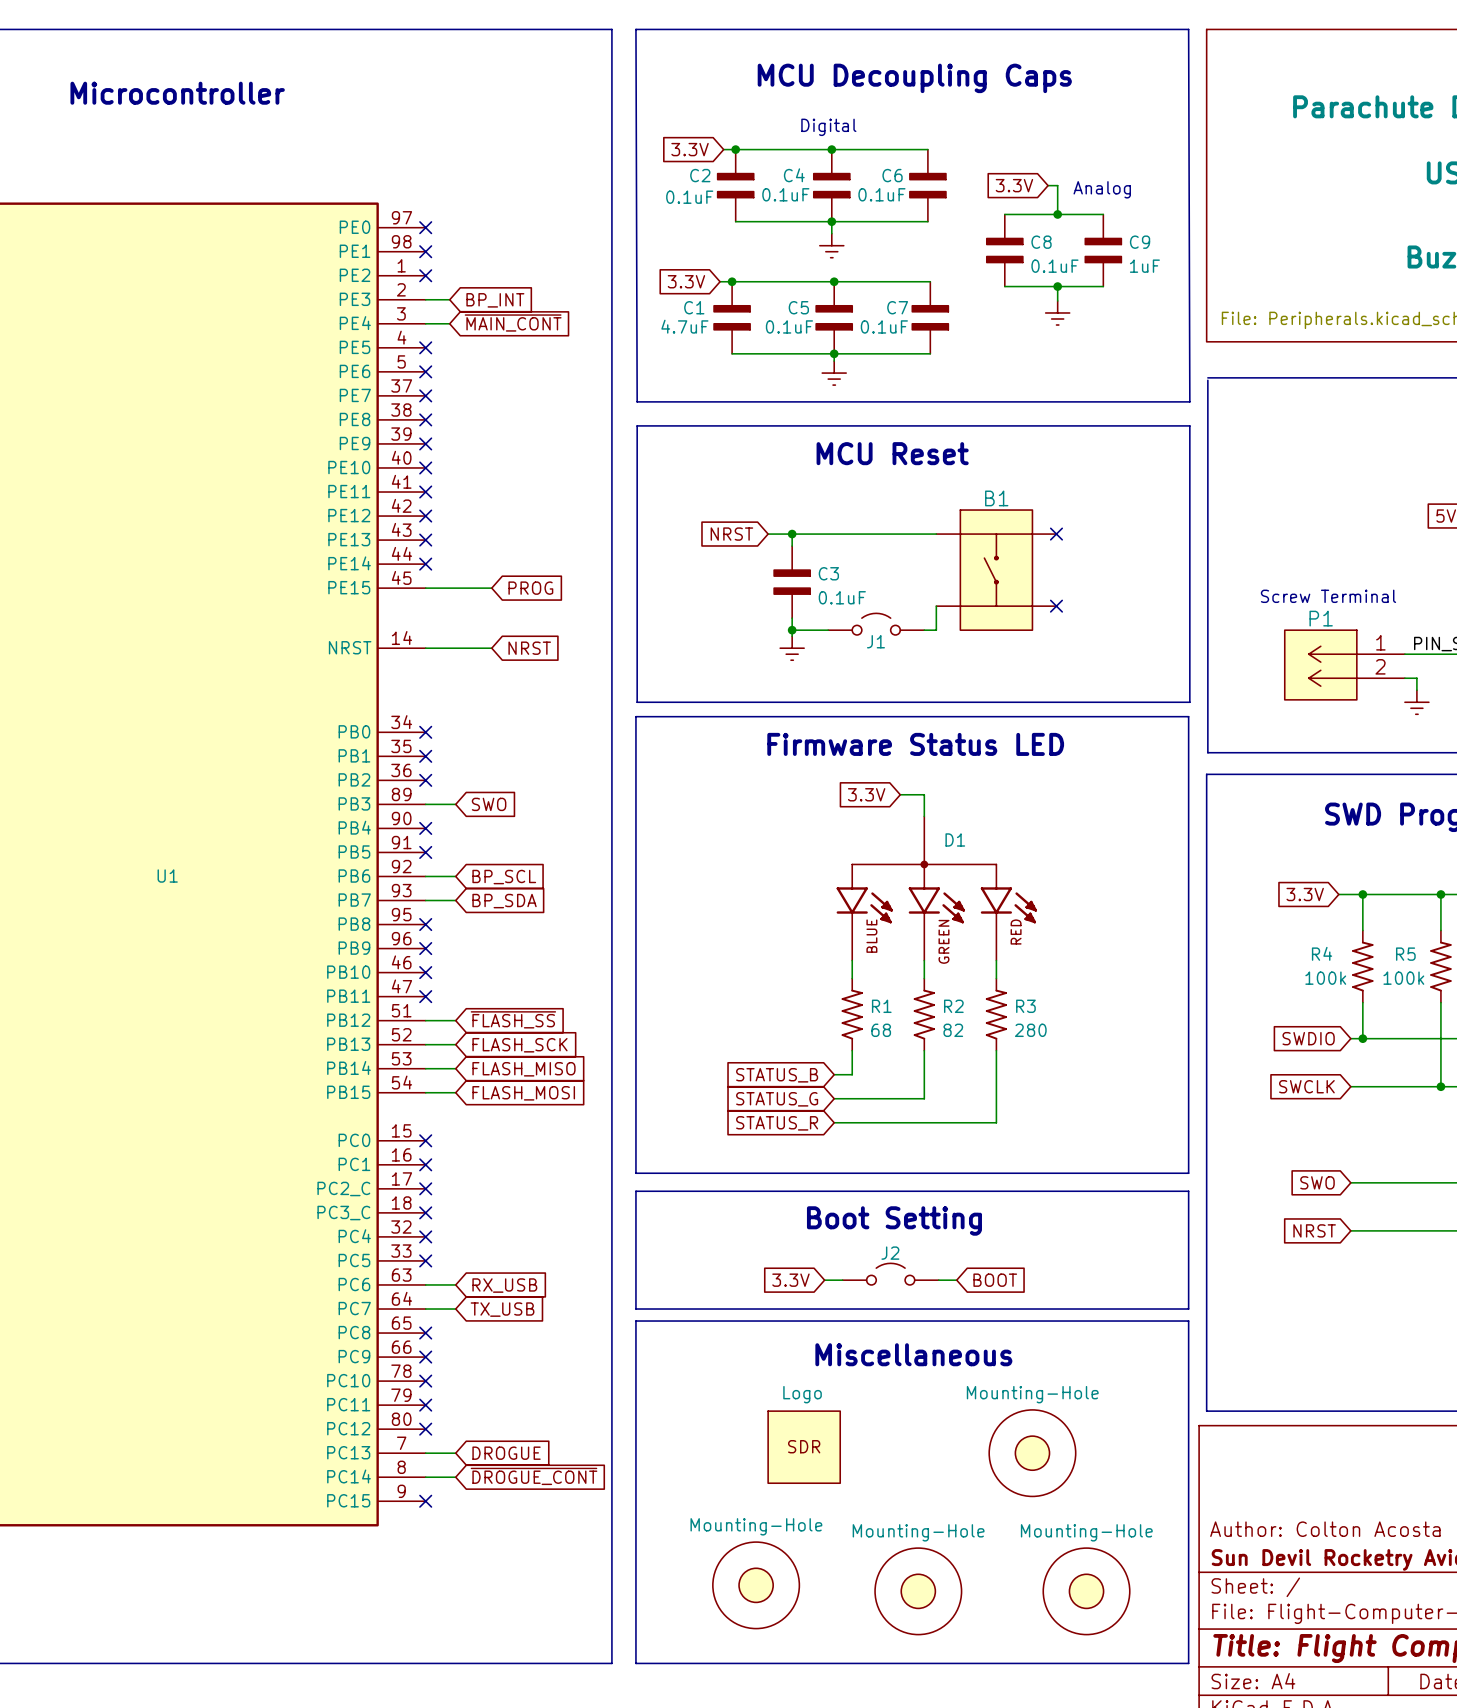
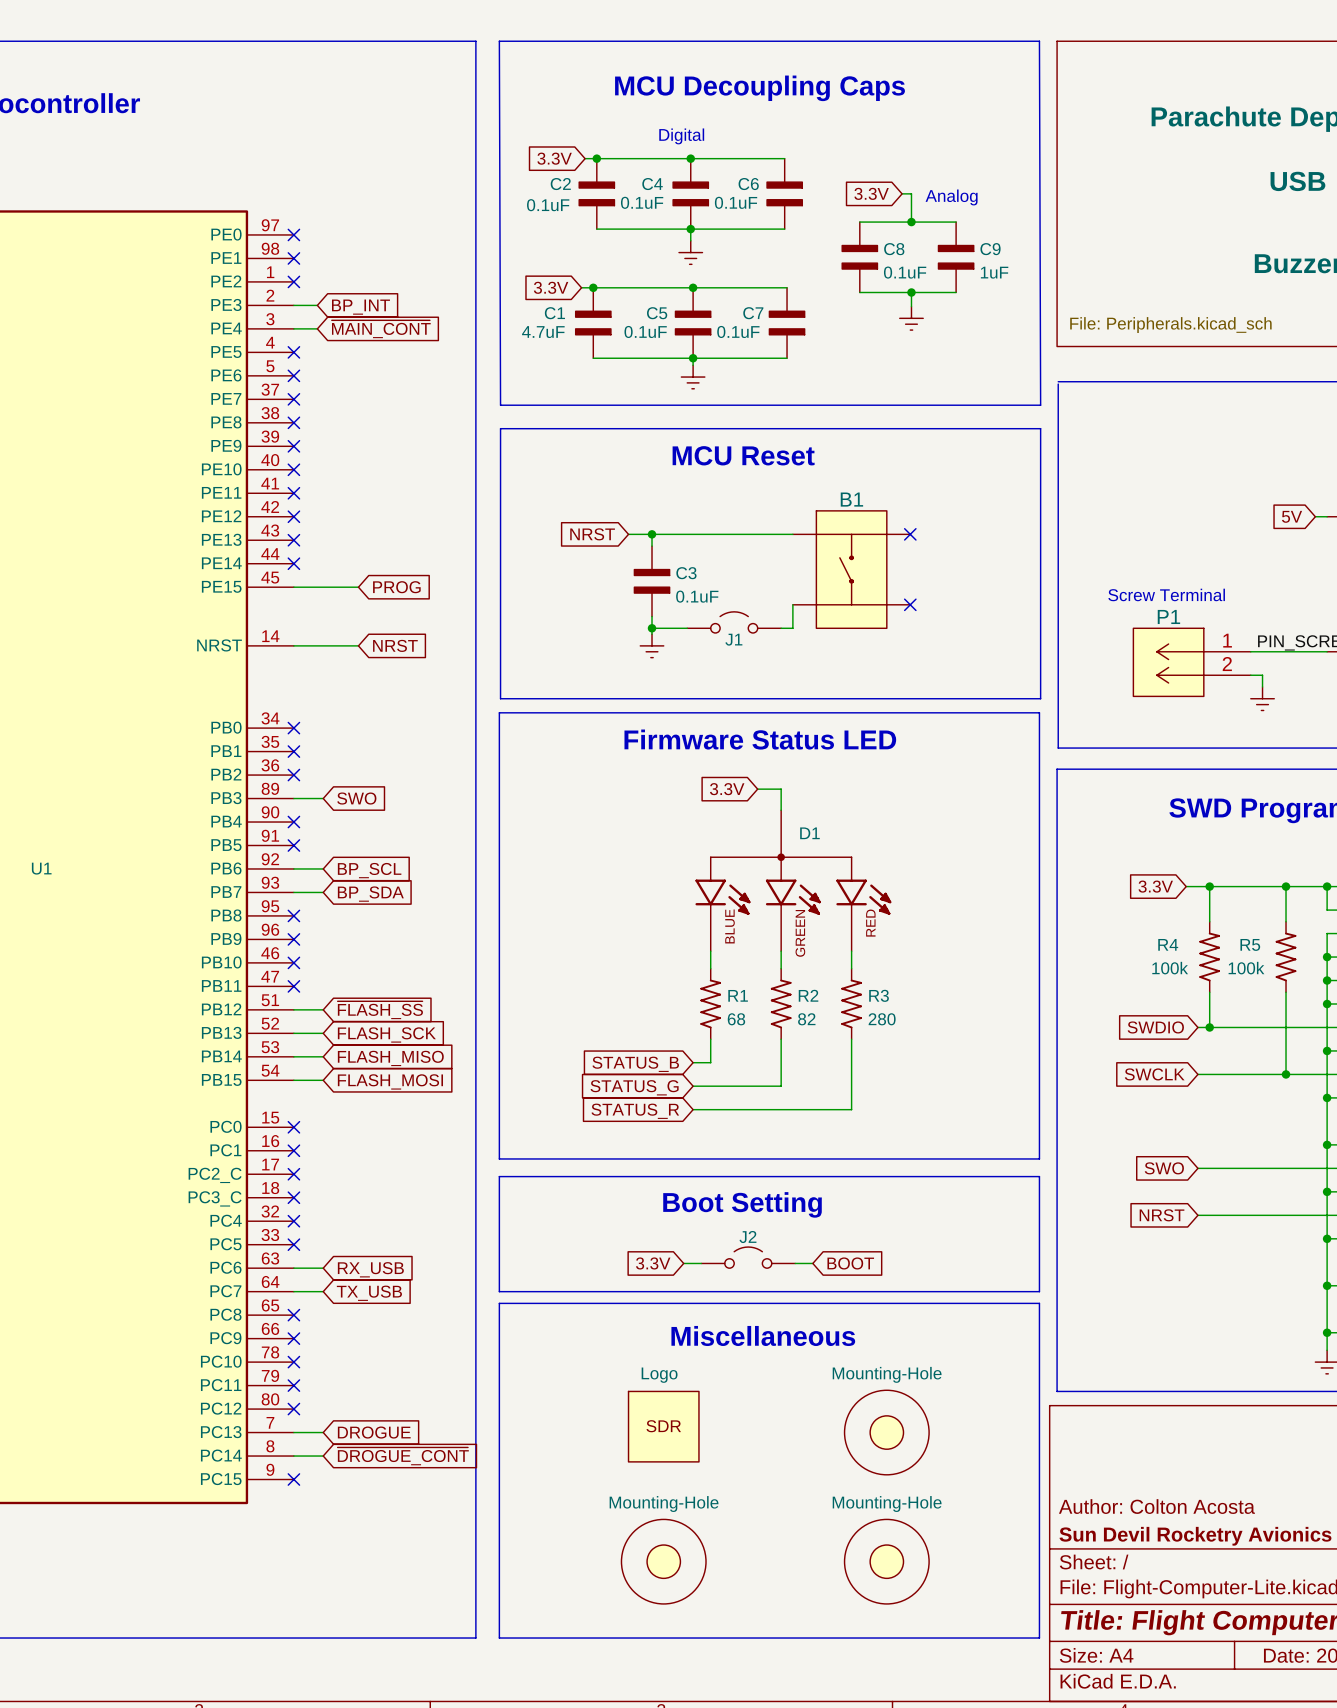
part position: (756, 1585) -> (663, 1561)
part: Mounting-Hole (918, 1591) -> none
part position: (1086, 1591) -> (886, 1561)

